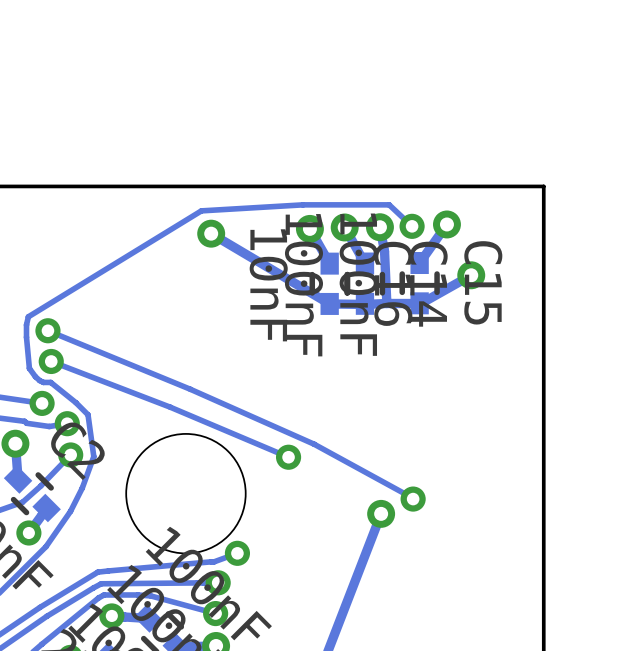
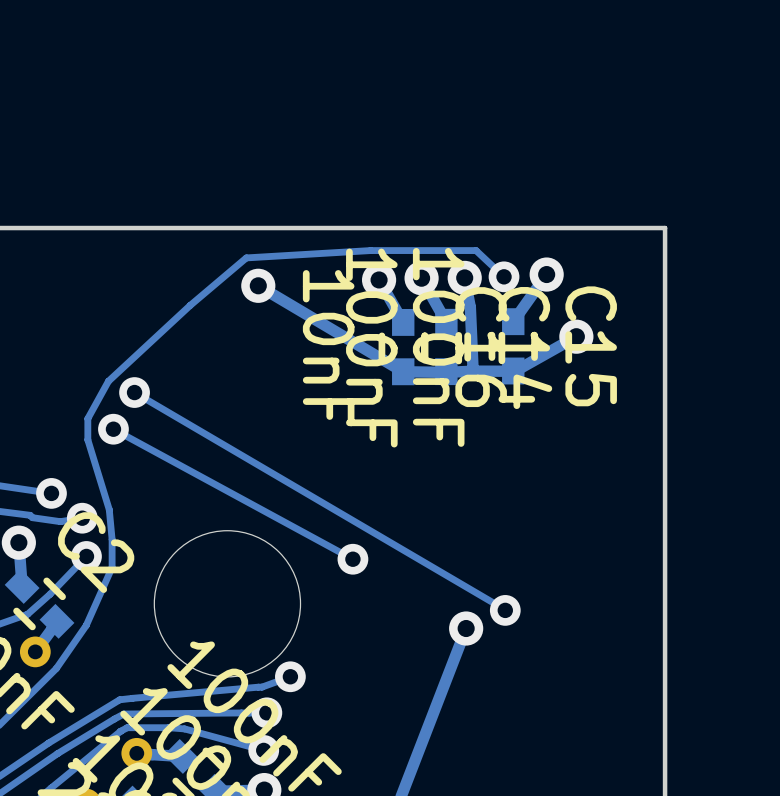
track: (201, 210) (28, 316) (26, 337) (29, 368) (39, 380) (50, 382) (88, 414) (93, 456) (82, 488) (70, 511) -> (246, 257) (190, 305) (108, 381) (87, 418) (87, 439) (109, 509) (112, 567) (86, 625)
via: none -> (134, 392)
track: (47, 330) (190, 389) (314, 444) (404, 493) -> (134, 392) (495, 603)
via: (47, 330) -> none
via: none -> (113, 429)
track: (51, 361) (170, 407) (288, 457) -> (113, 429) (352, 559)
via: (51, 361) -> none

